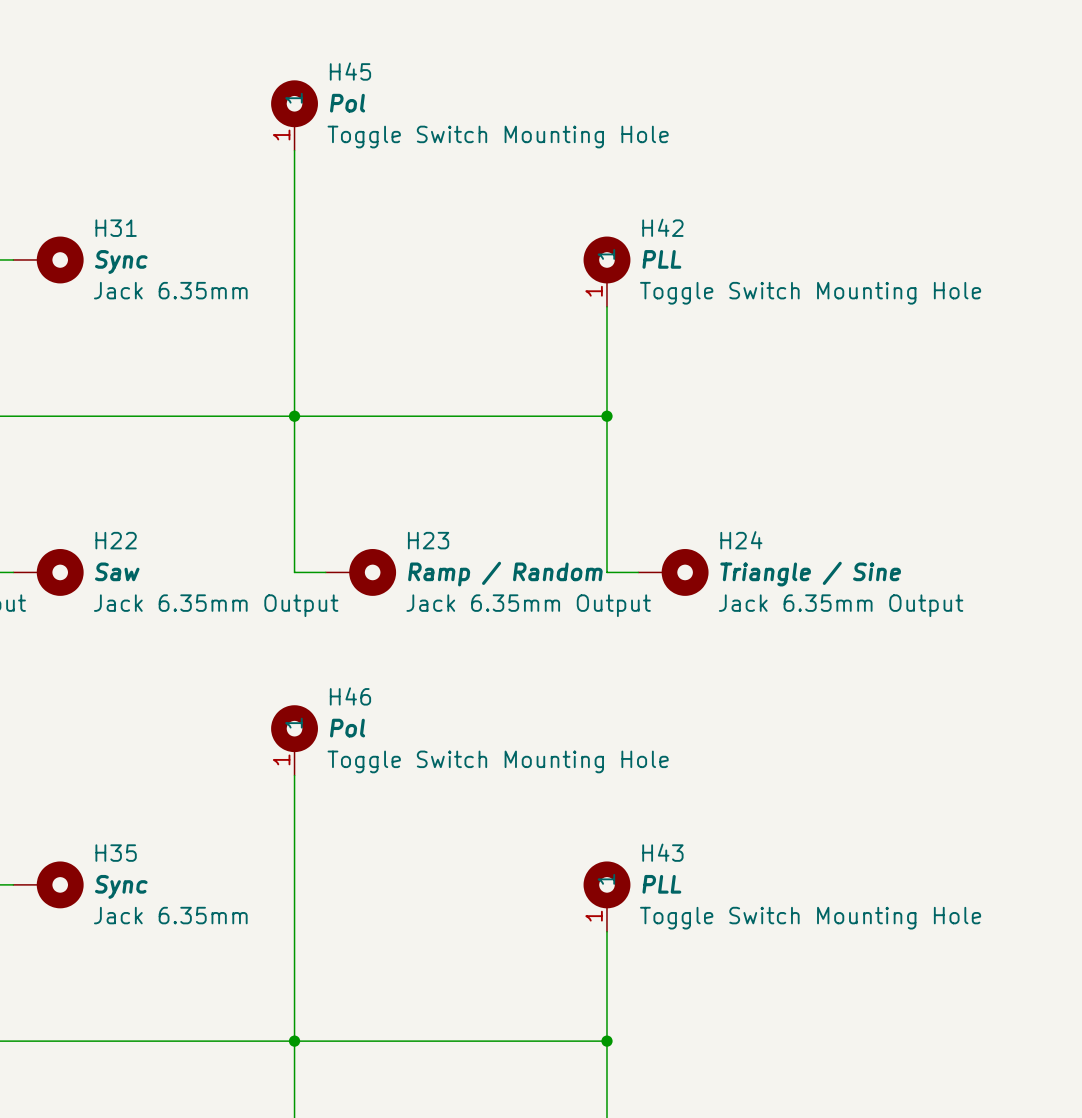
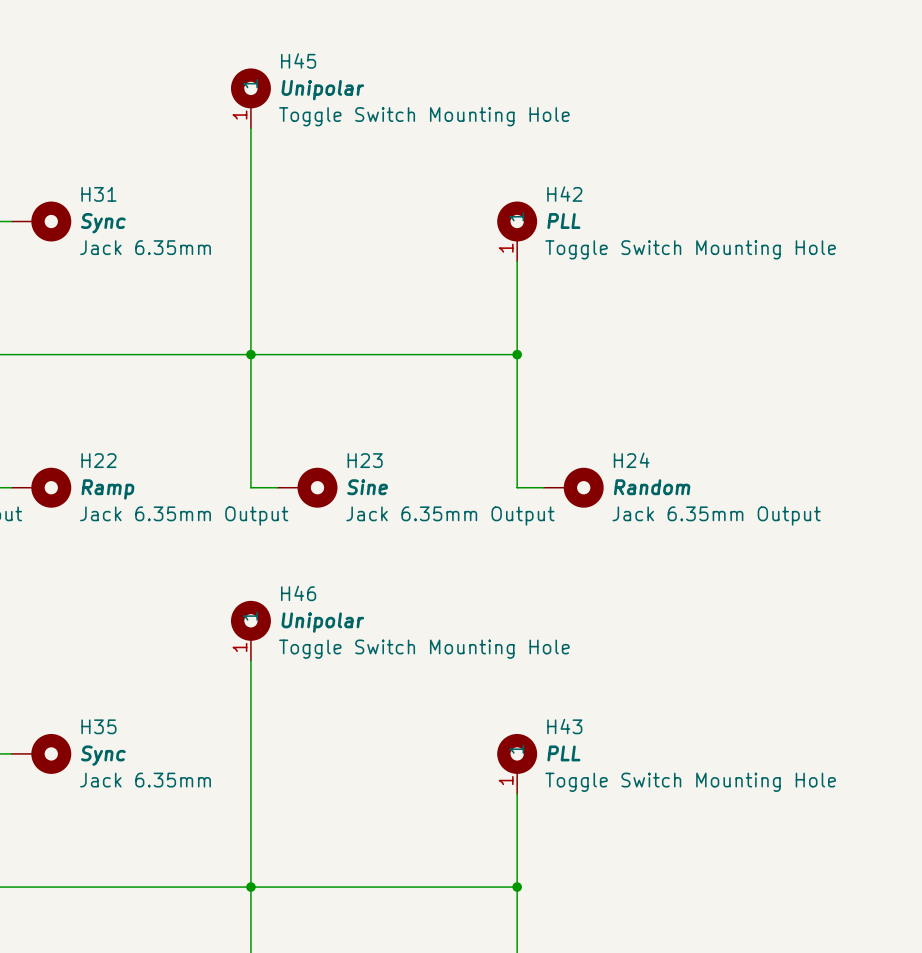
H45 value: Pol (347, 103) -> Unipolar (322, 90)
H22 value: Saw (117, 571) -> Ramp (107, 489)
H23 value: Ramp / Random (505, 574) -> Sine (367, 487)
H24 value: Triangle / Sine (810, 574) -> Random (652, 487)
H46 value: Pol (347, 728) -> Unipolar (322, 622)

